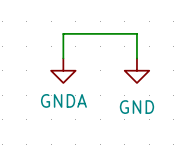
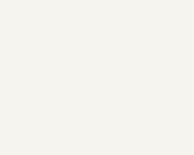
wire: (63, 58) (63, 33) (136, 33) (136, 58) -> none
power symbol: GNDA (63, 70) -> none
power symbol: GND (136, 70) -> none

